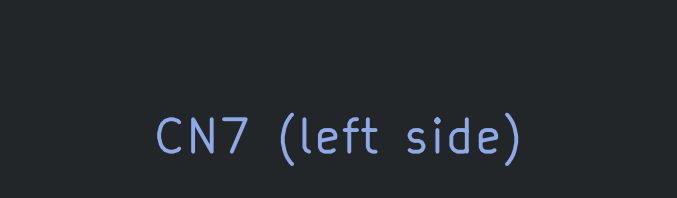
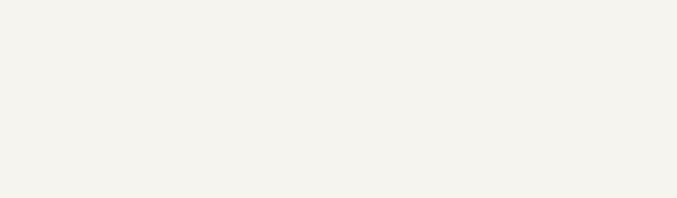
text: CN7 (left side) (337, 139) -> none

